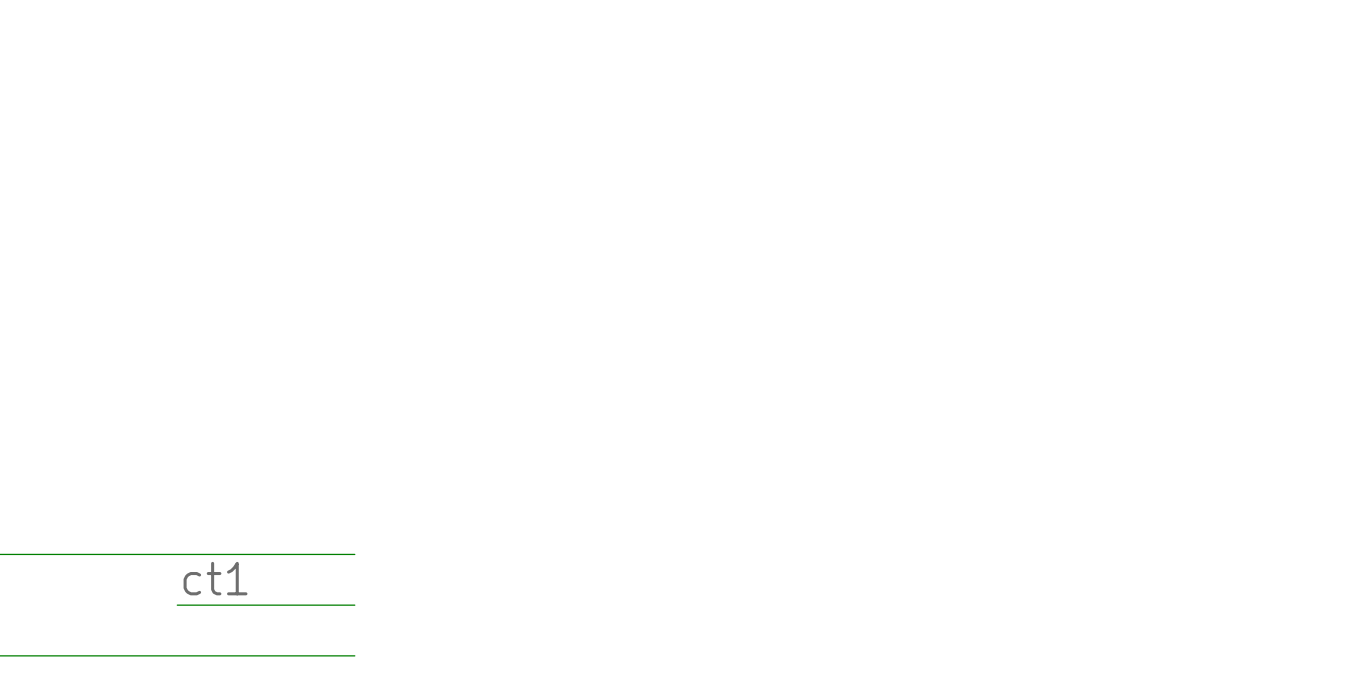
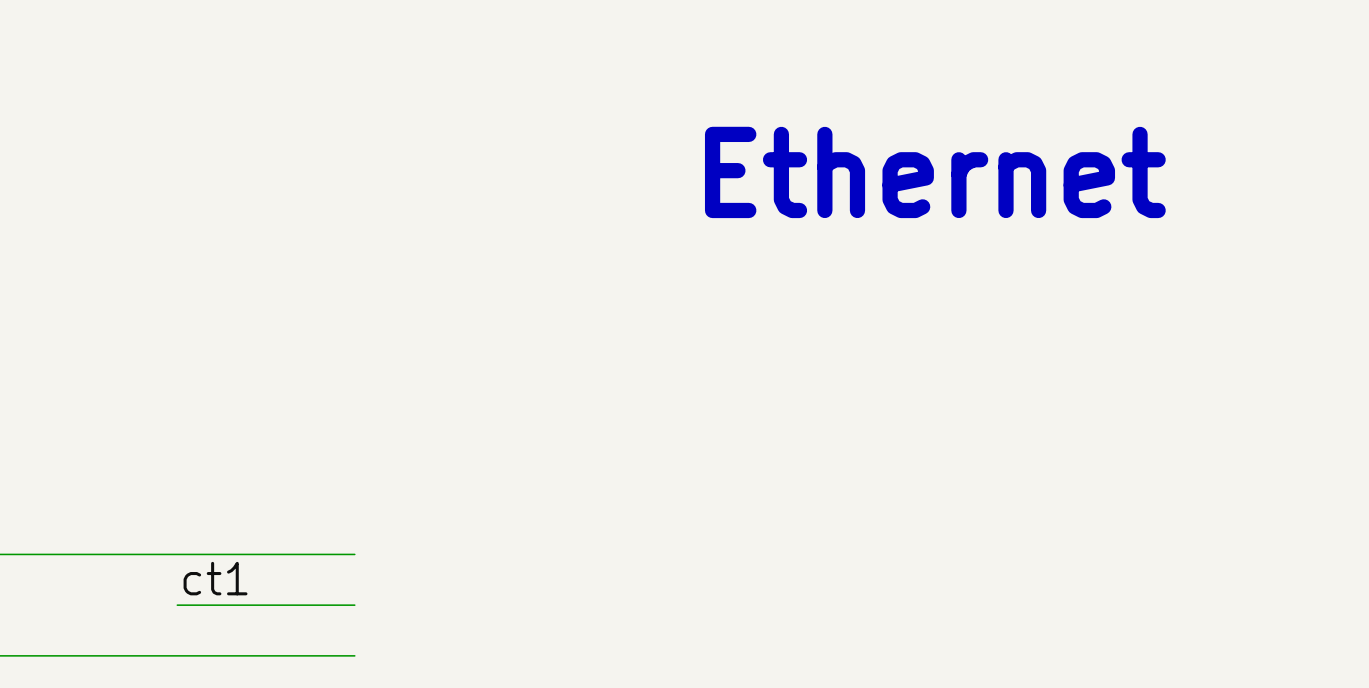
text: none -> Ethernet (935, 172)

